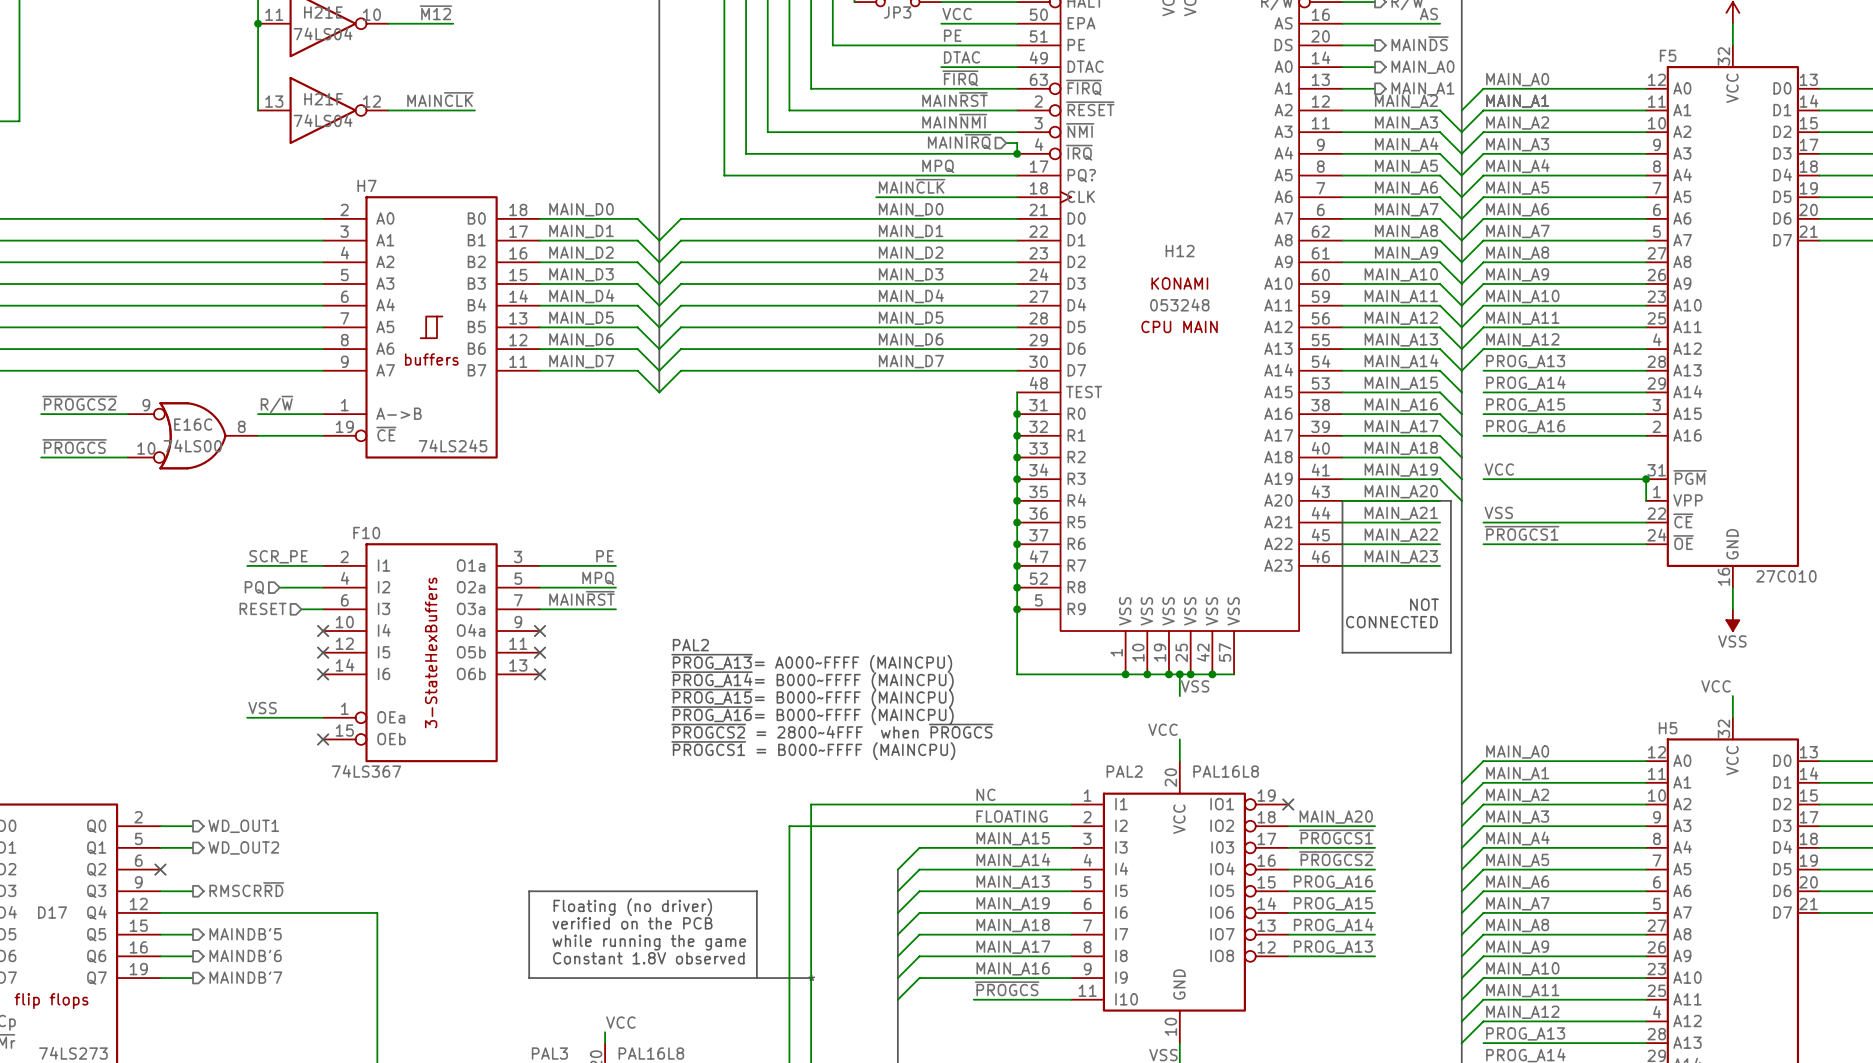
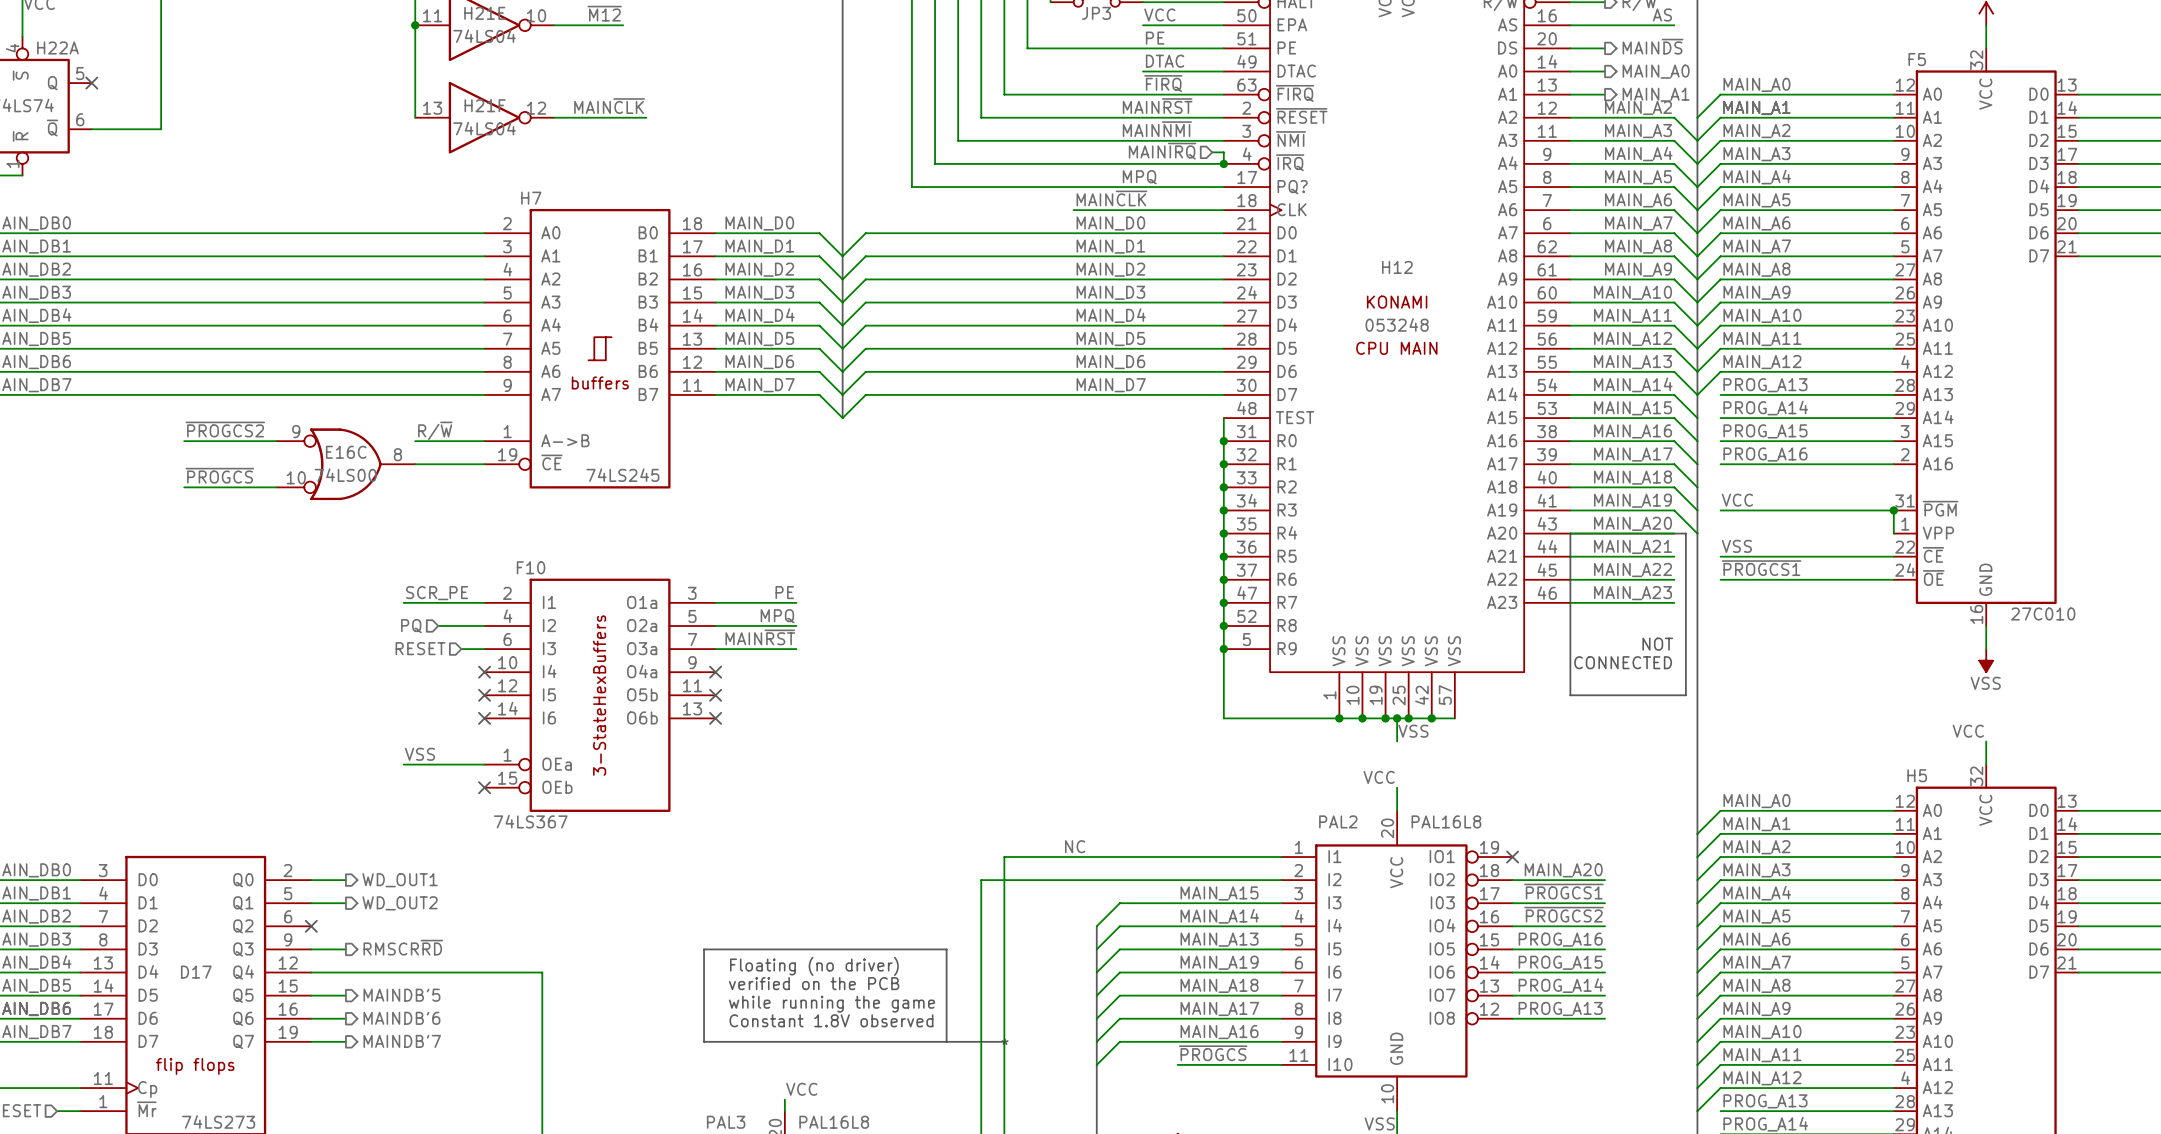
text: PAL2 (690, 645) -> none
text: ~{PROG_A13}= A000~FFFF (MAINCPU) (811, 663) -> none
text: ~{PROG_A14}= B000~FFFF (MAINCPU) (812, 680) -> none
text: ~{PROG_A15}= B000~FFFF (MAINCPU) (812, 698) -> none
text: ~{PROG_A16}= B000~FFFF (MAINCPU) (812, 715) -> none
text: ~{PROGCS2} = 2800~4FFF when ~{PROGCS} (832, 731) -> none
text: ~{PROGCS1} = B000~FFFF (MAINCPU) (813, 750) -> none
label position: NC (986, 794) -> NC (1075, 846)
label: FLOATING (1012, 816) -> none

